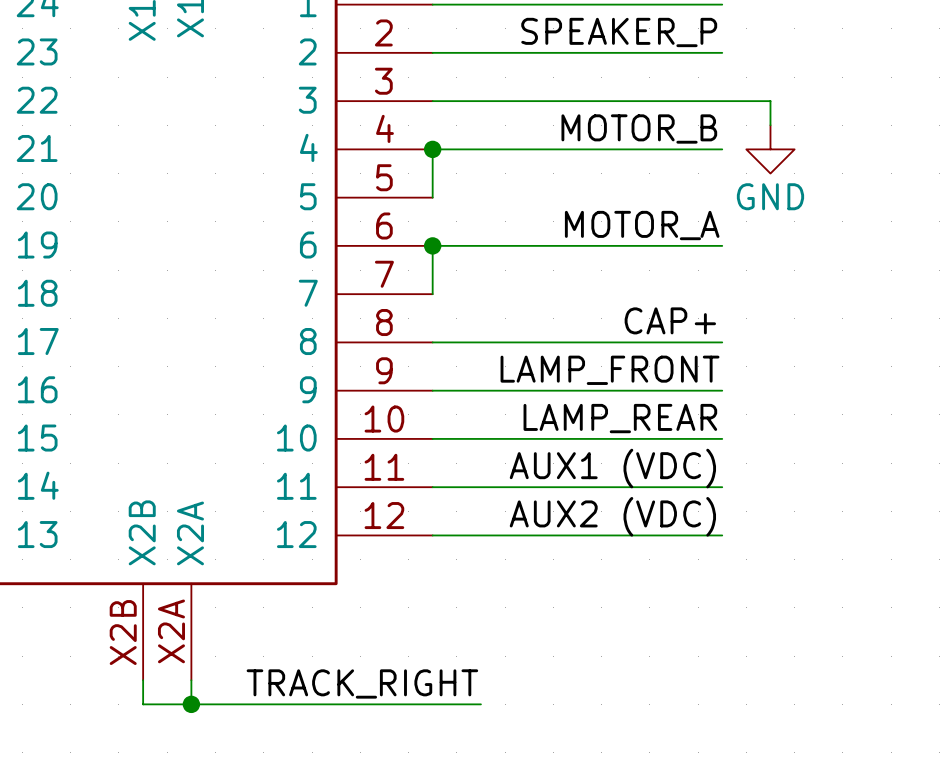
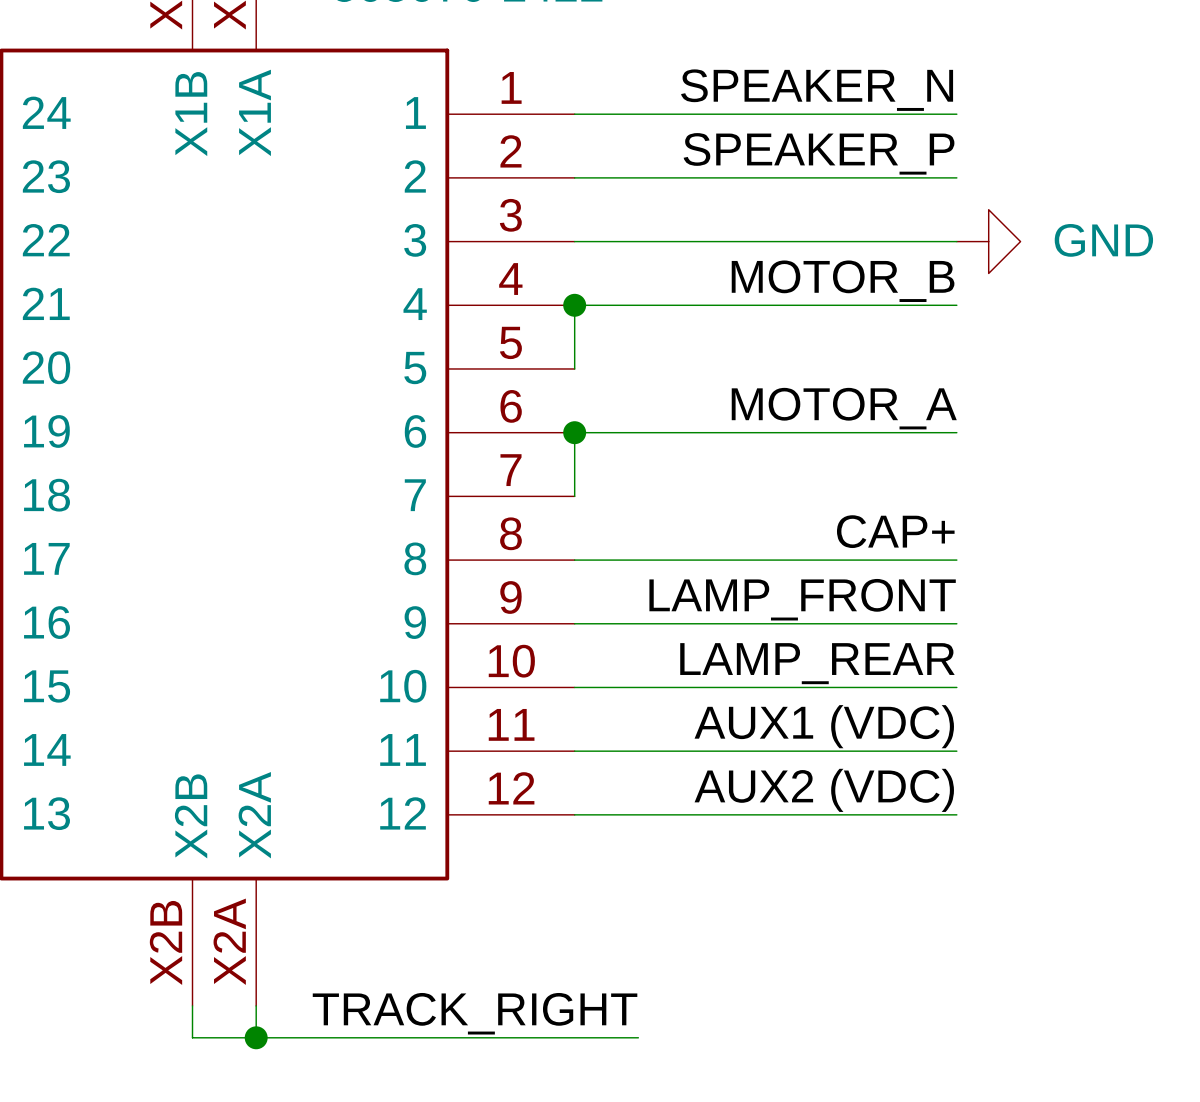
wire: (722, 101) (770, 101) (770, 125) -> none
power symbol rotation: 0° (770, 149) -> 90° counterclockwise (988, 241)
power symbol position: GND (770, 149) -> GND (988, 241)
power symbol text position: GND (770, 196) -> GND (1103, 240)

